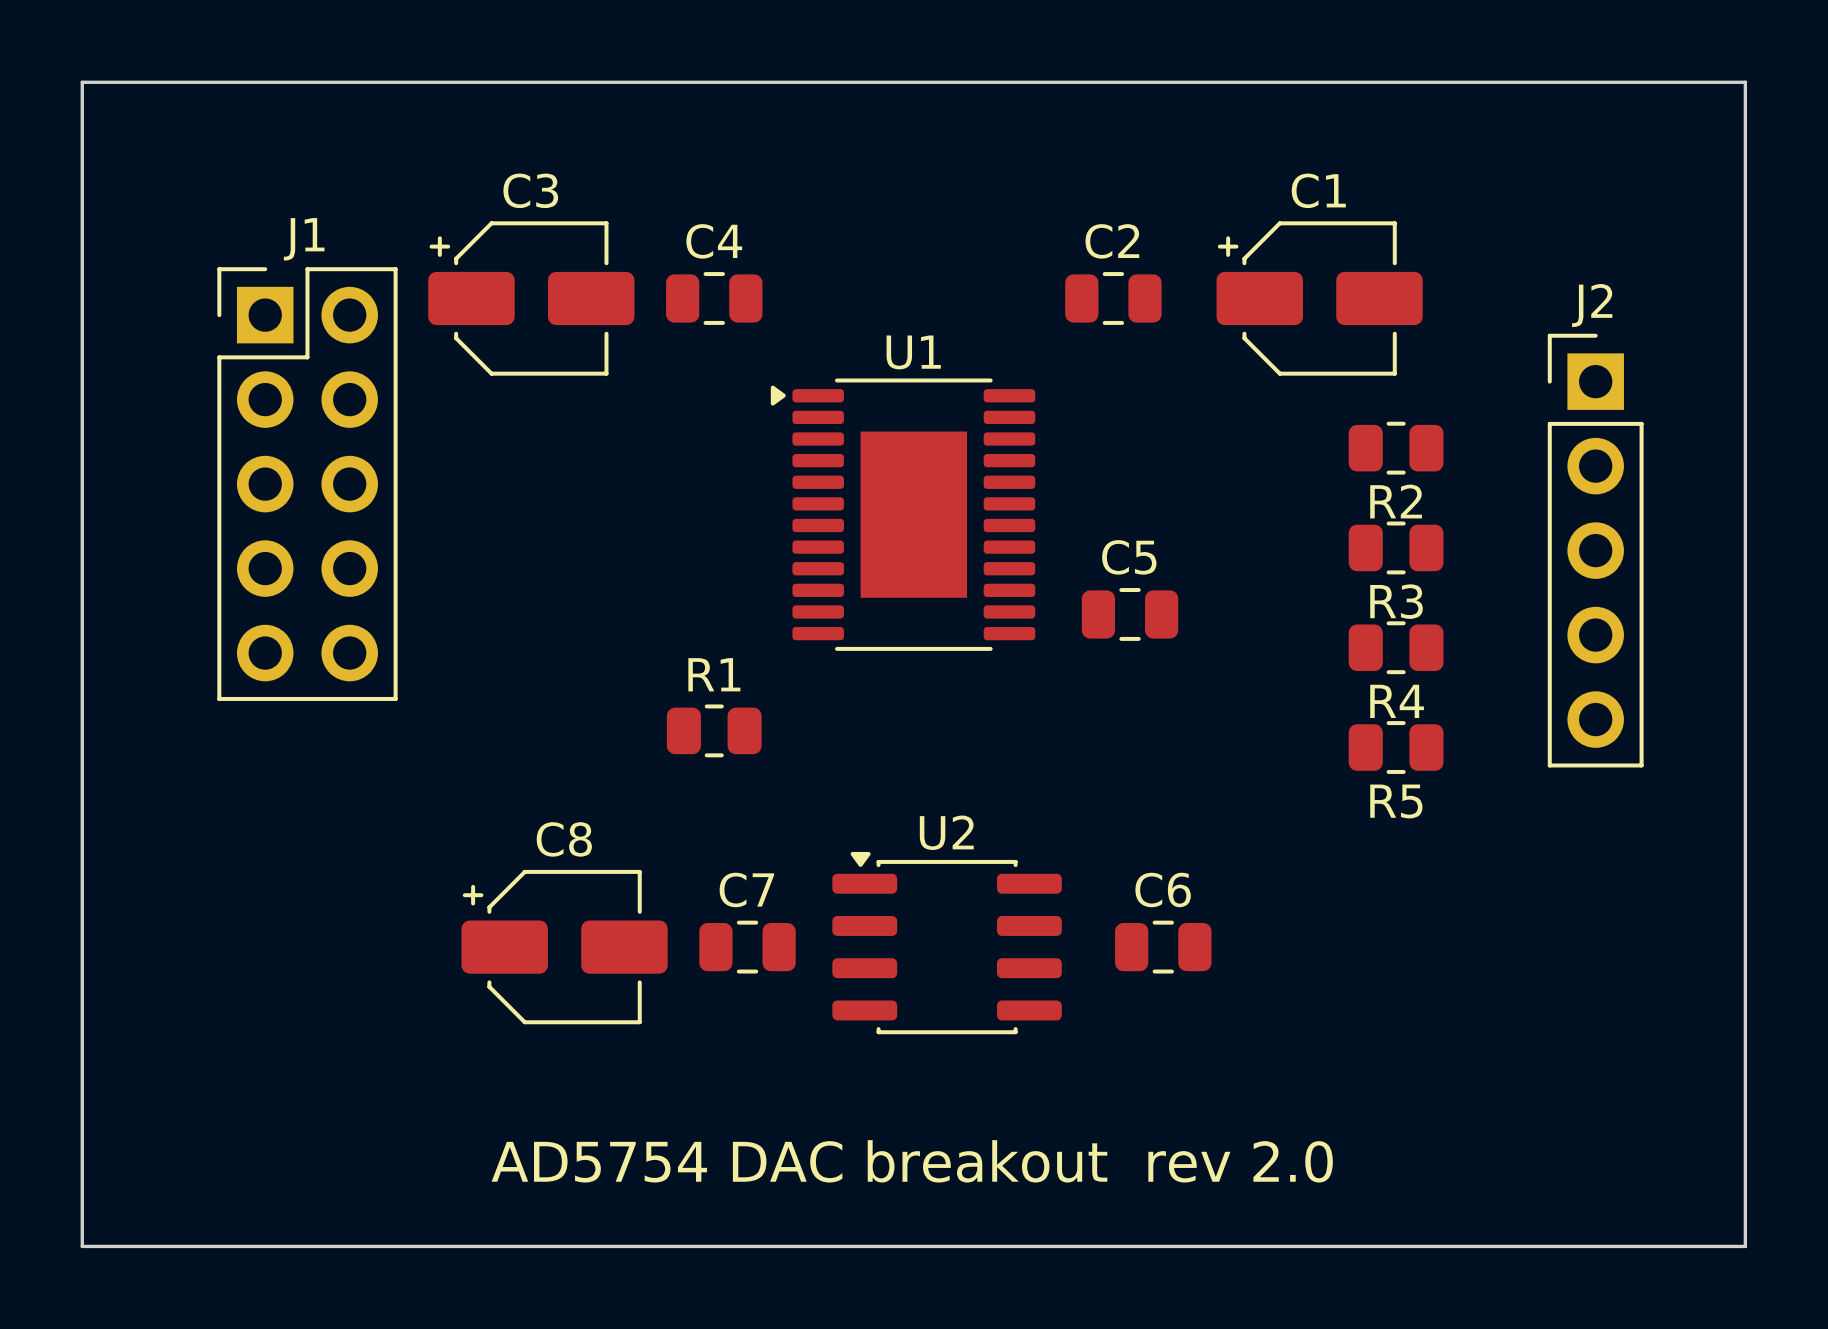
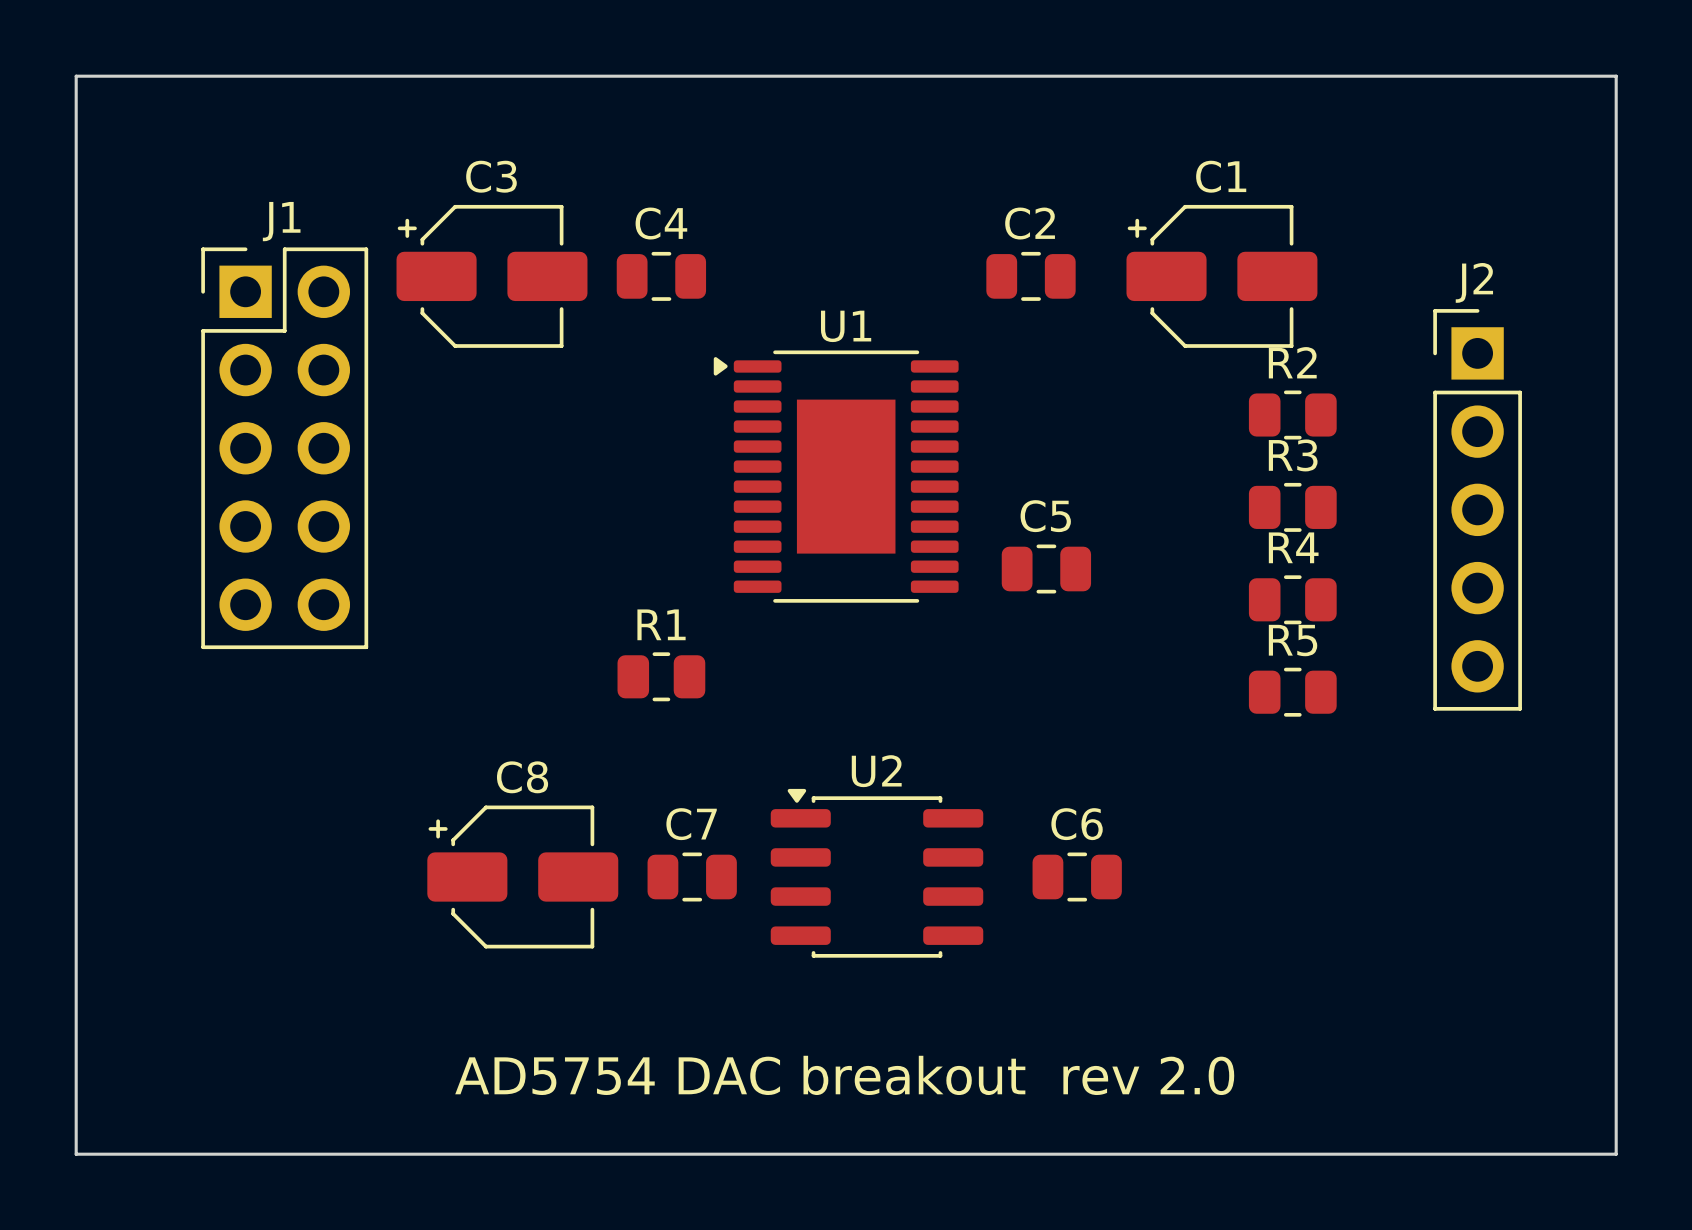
R2 name position: R2 (1396, 501) -> R2 (1292, 362)
R3 name position: R3 (1396, 601) -> R3 (1293, 455)
R4 name position: R4 (1397, 701) -> R4 (1293, 547)
R5 name position: R5 (1396, 801) -> R5 (1293, 640)

